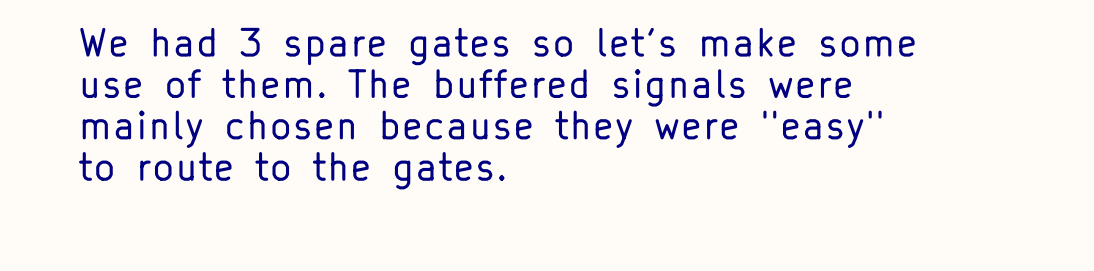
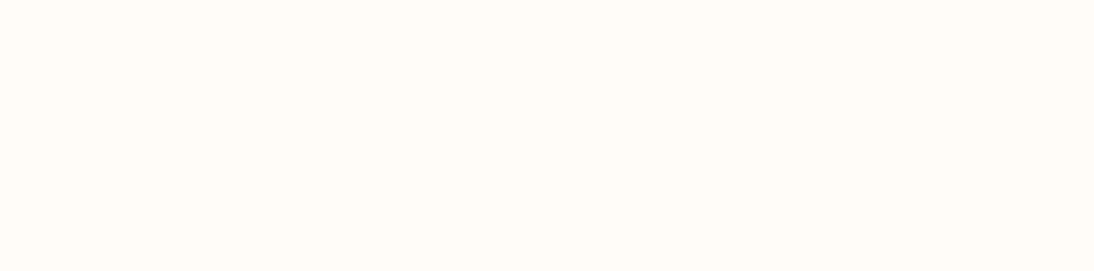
text: We had 3 spare gates so let's make some (497, 46) -> none
text: use of them. The buffered signals were (466, 87) -> none
text: mainly chosen because they were "easy" (482, 129) -> none
text: to route to the gates. (291, 170) -> none

